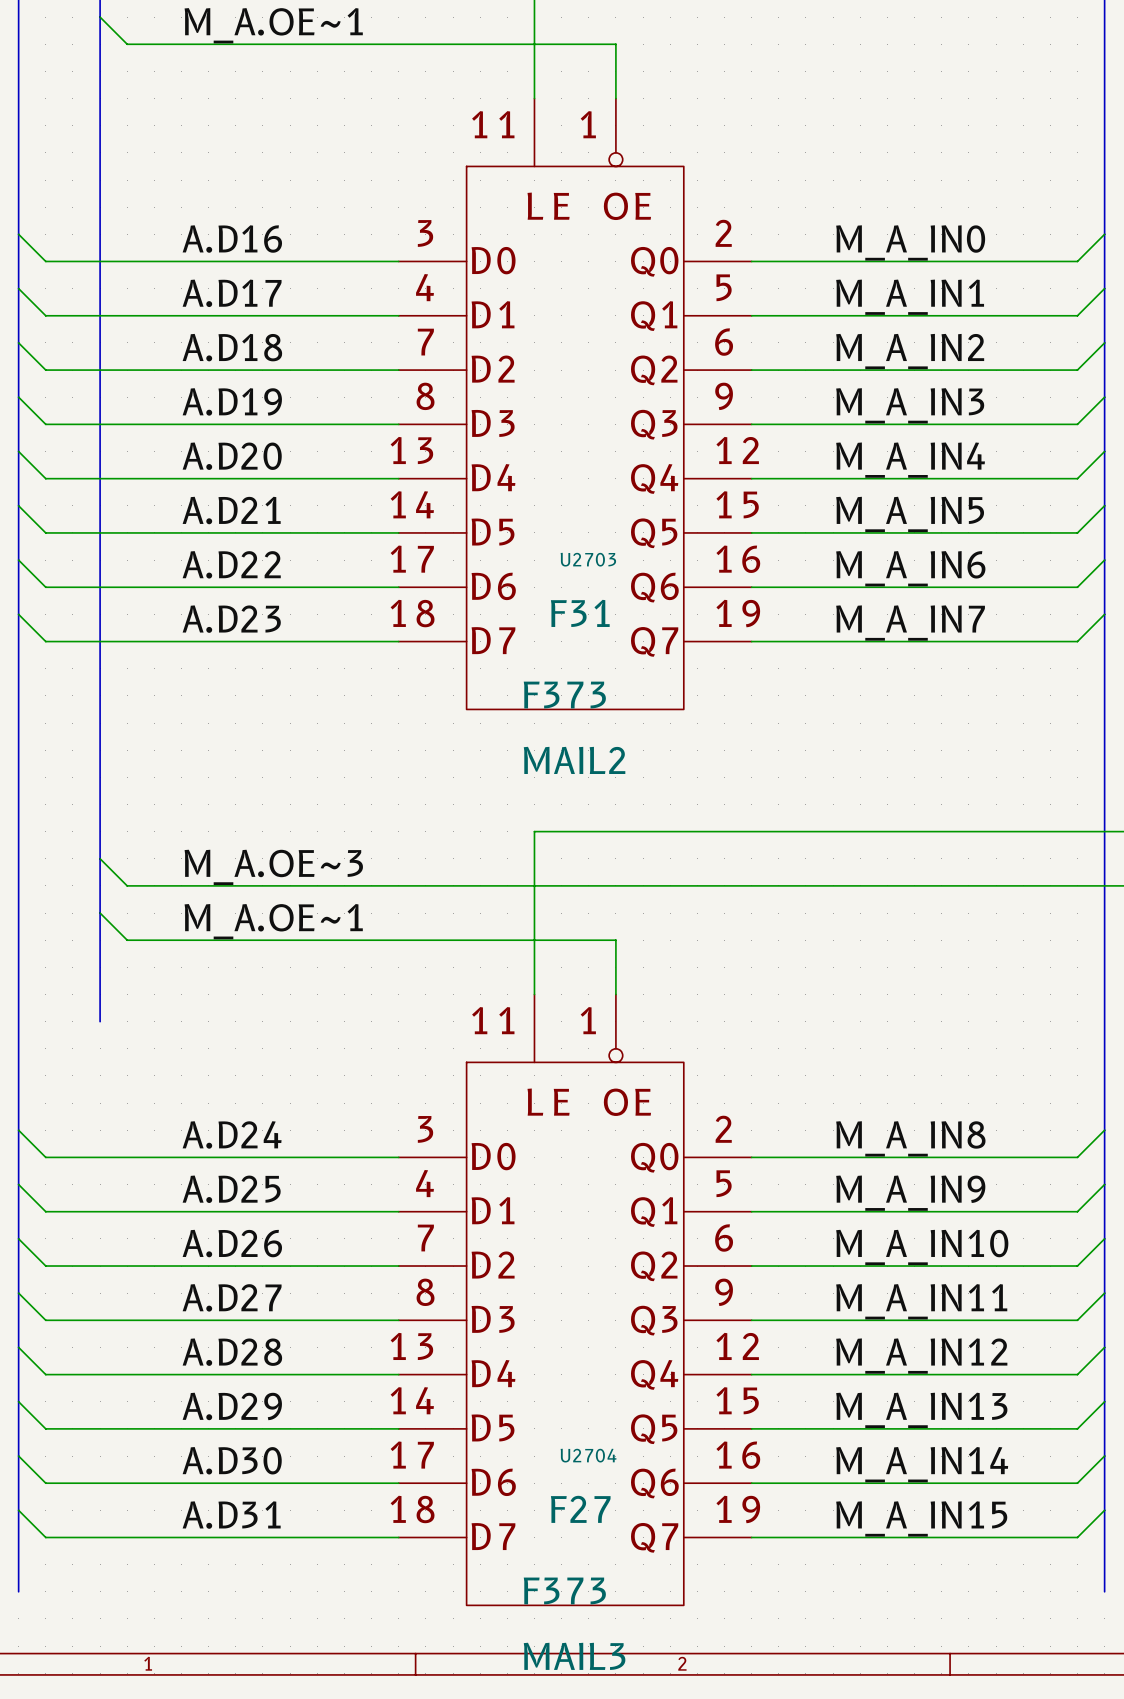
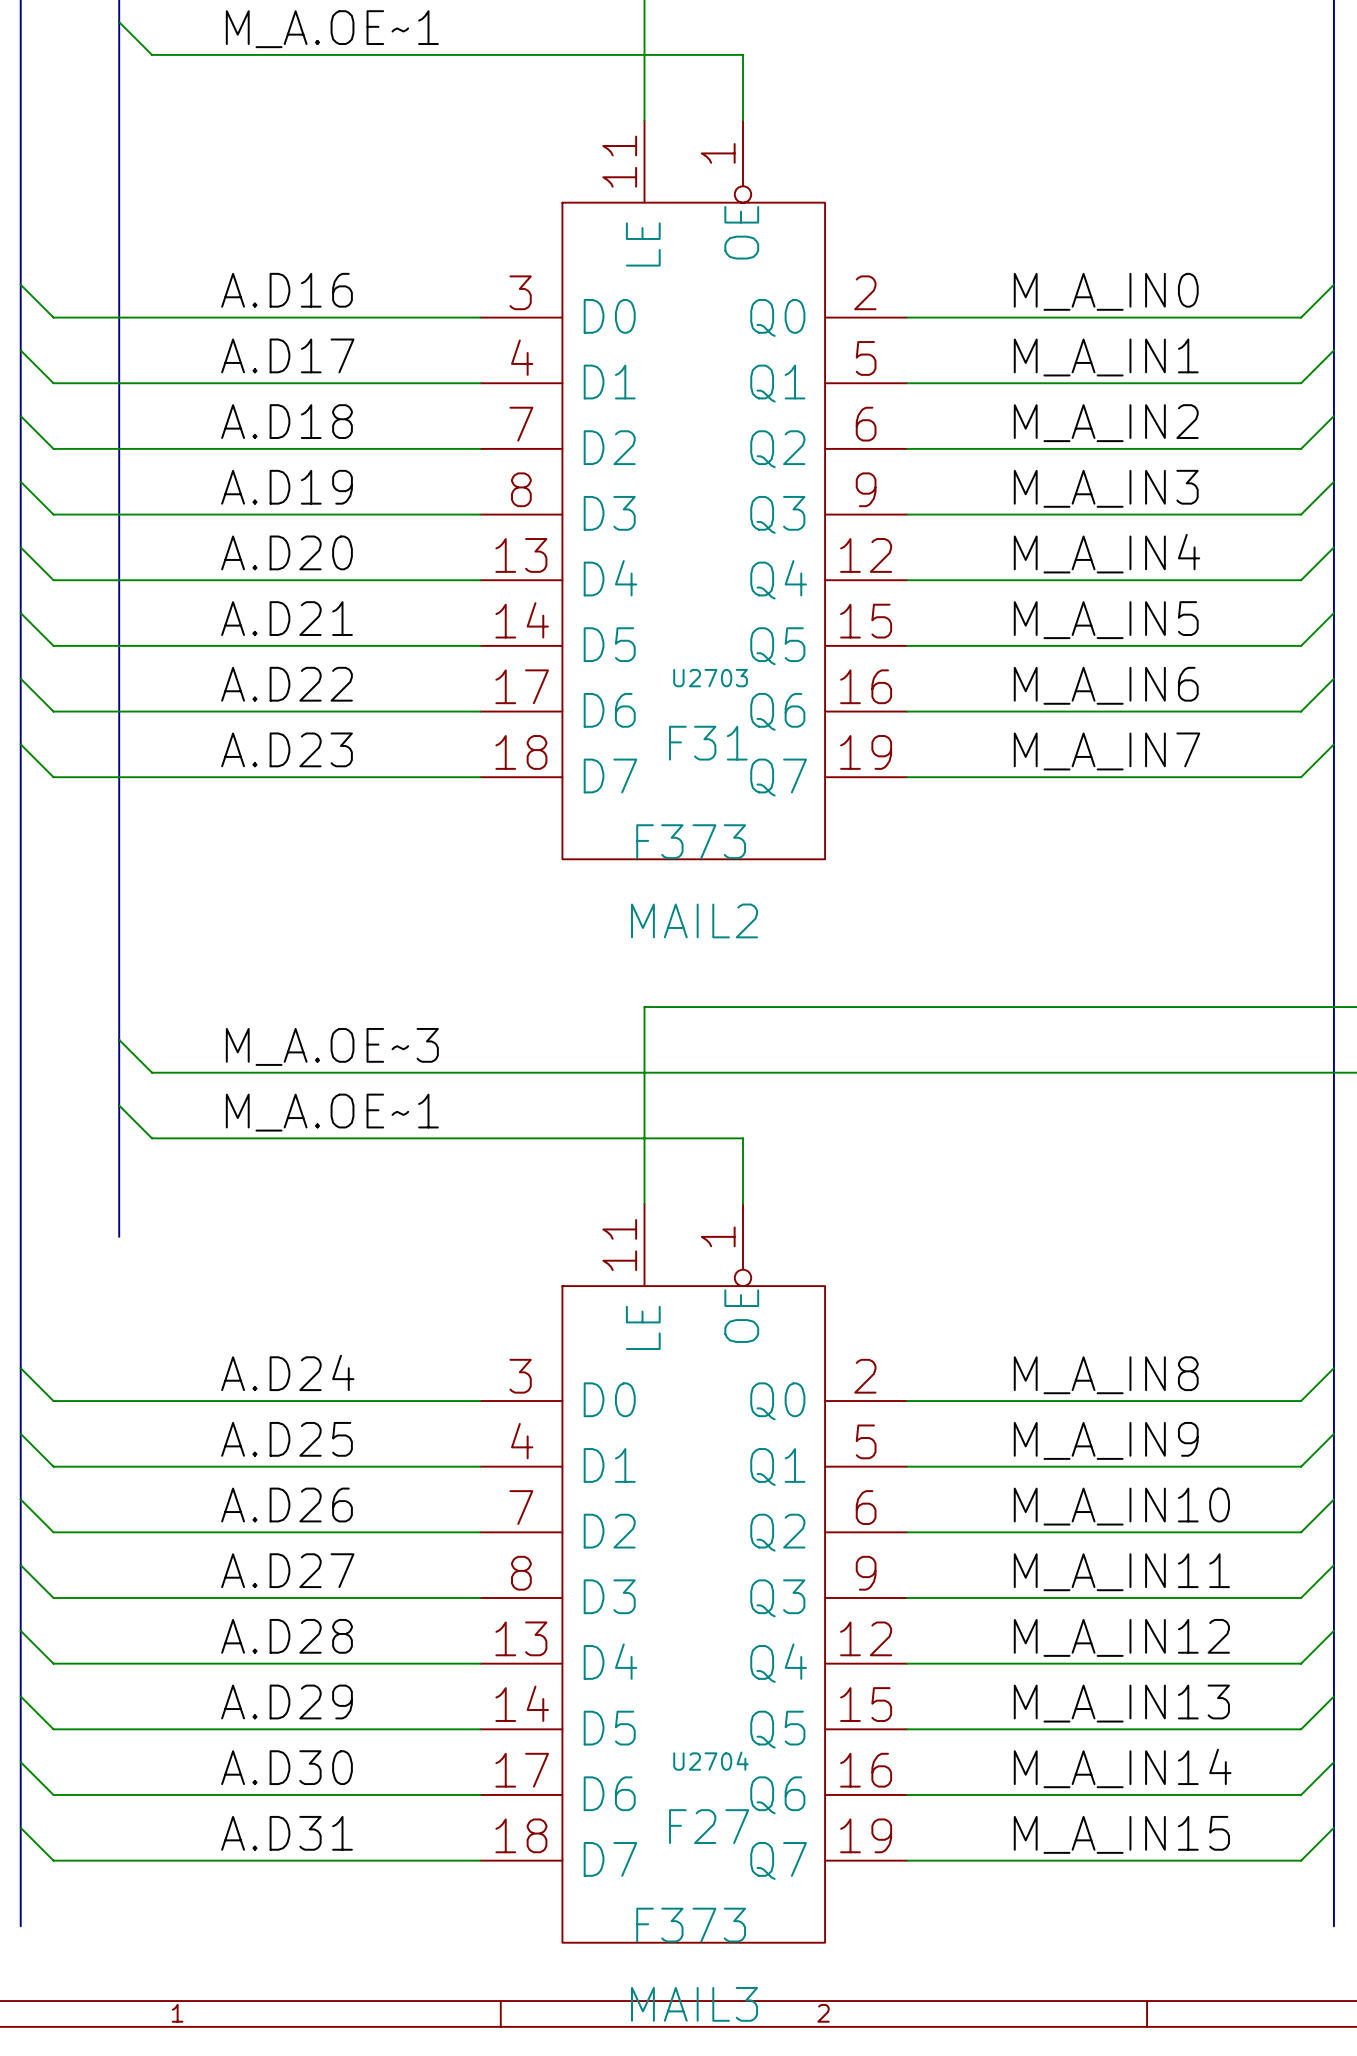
U2703 symbol: [398, 98, 752, 710] -> [480, 120, 908, 860]
U2704 symbol: [398, 994, 752, 1606] -> [480, 1204, 908, 1943]

